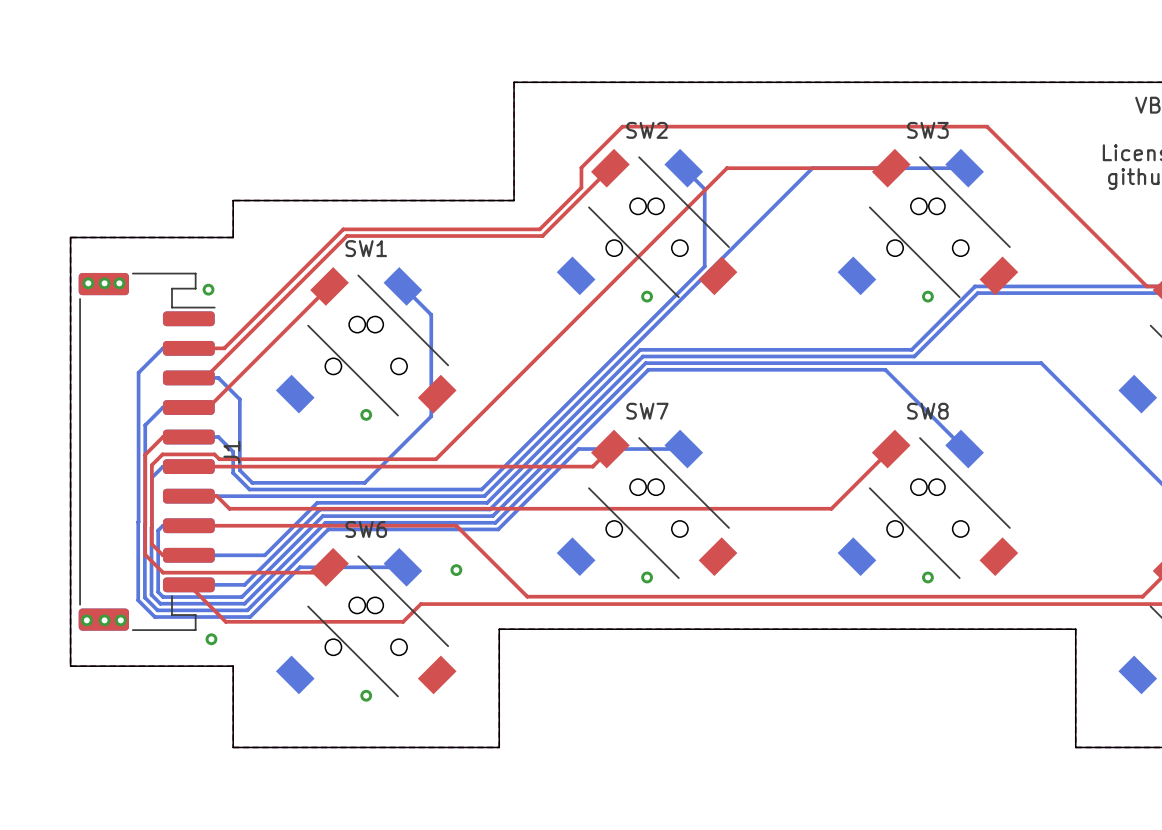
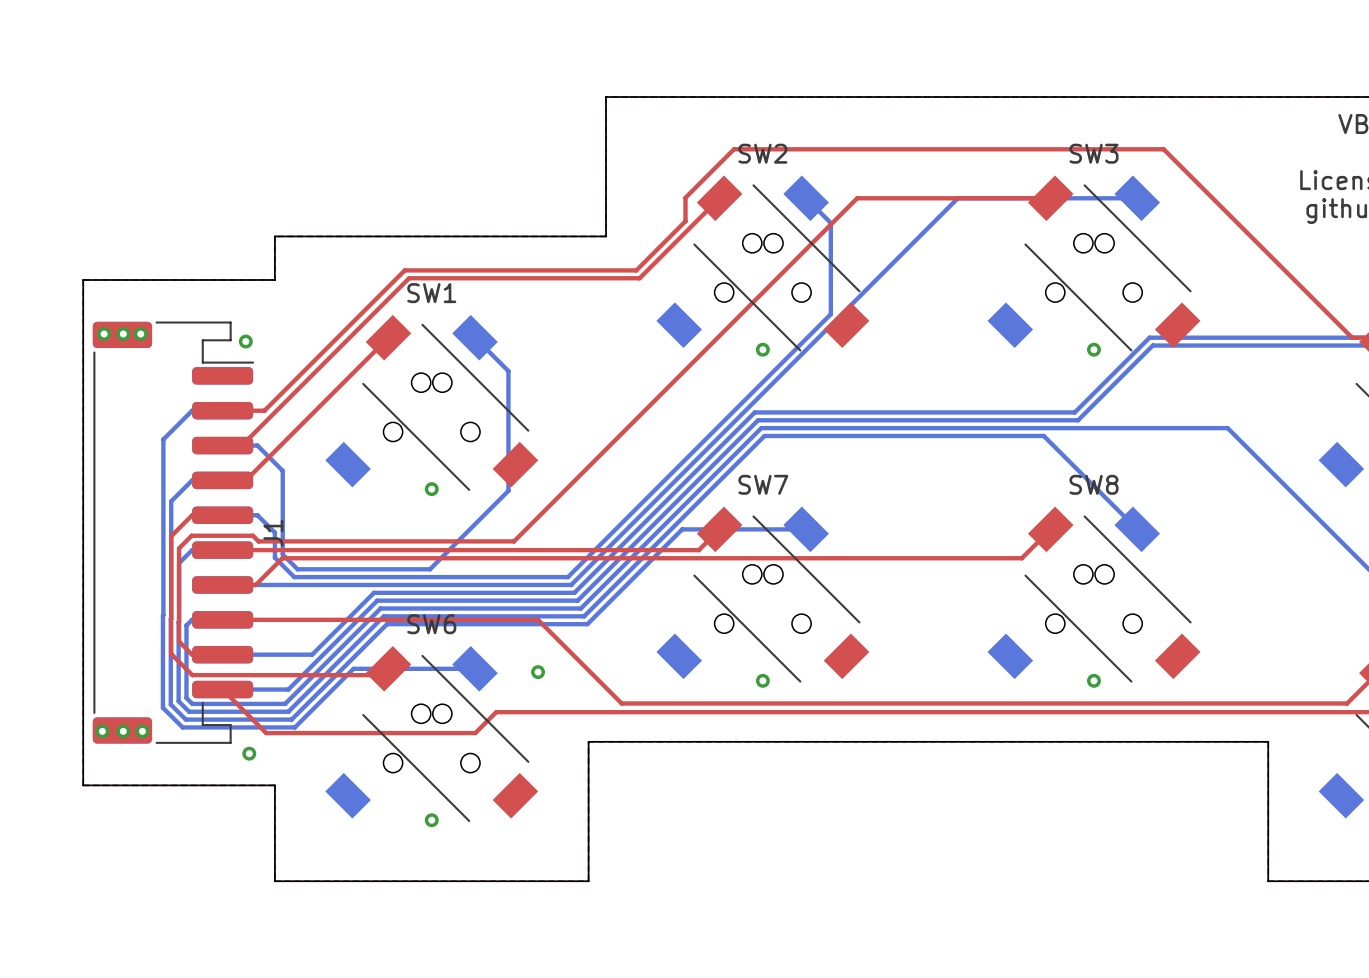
top track: (866, 473) (831, 508) (229, 508) (216, 496) -> (1021, 558) (282, 558) (255, 584)

